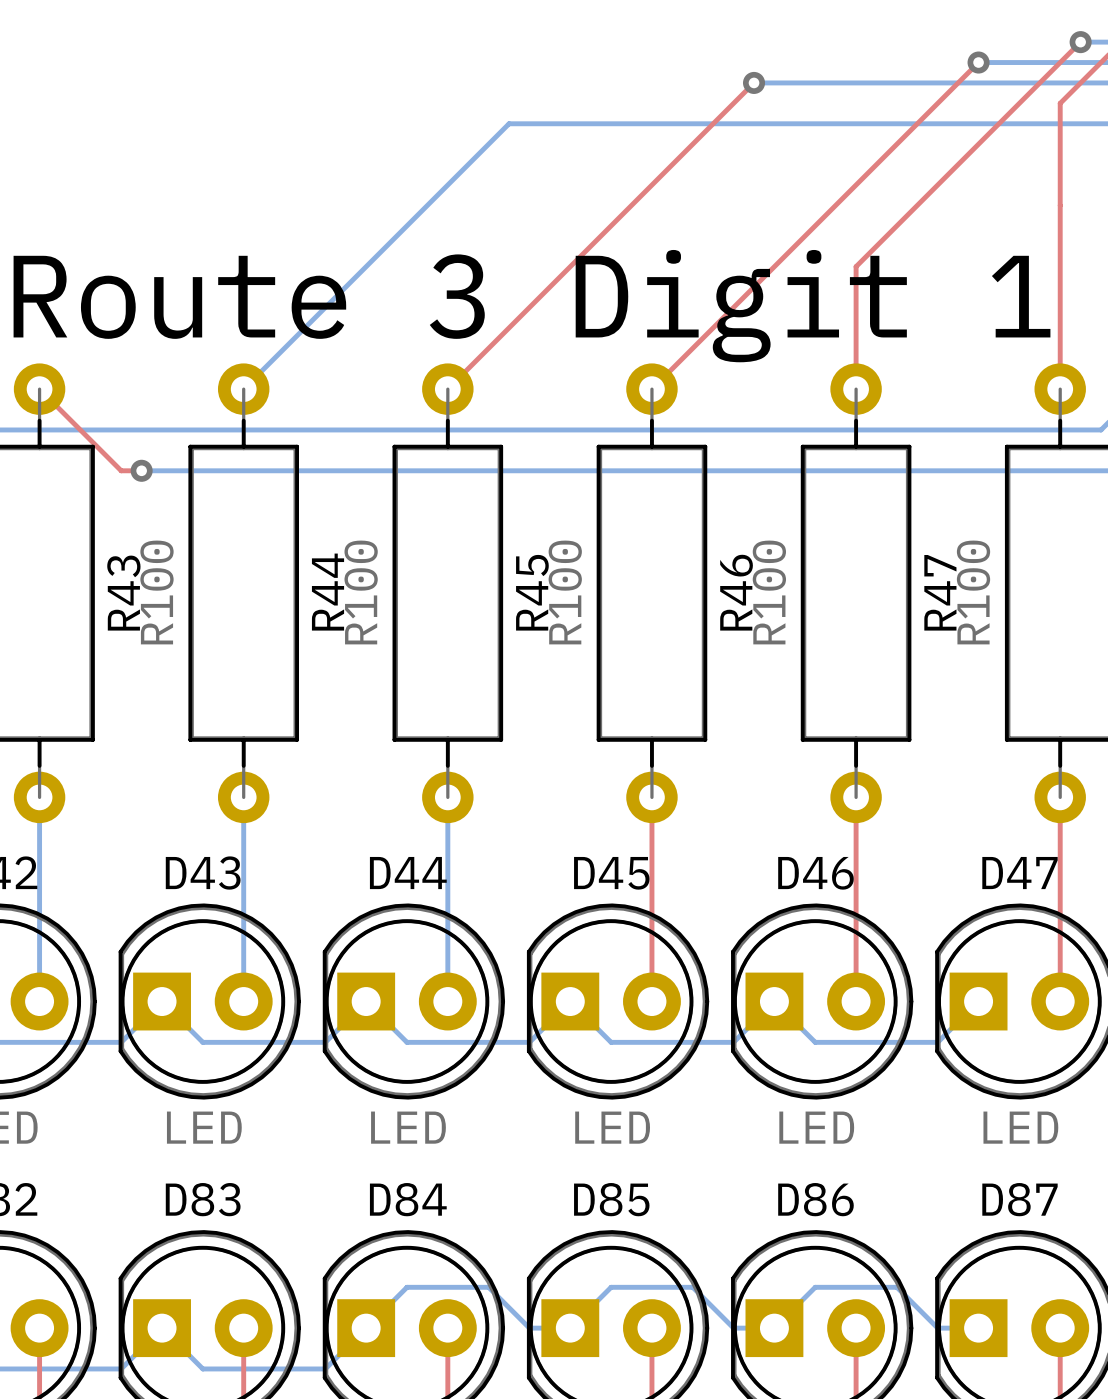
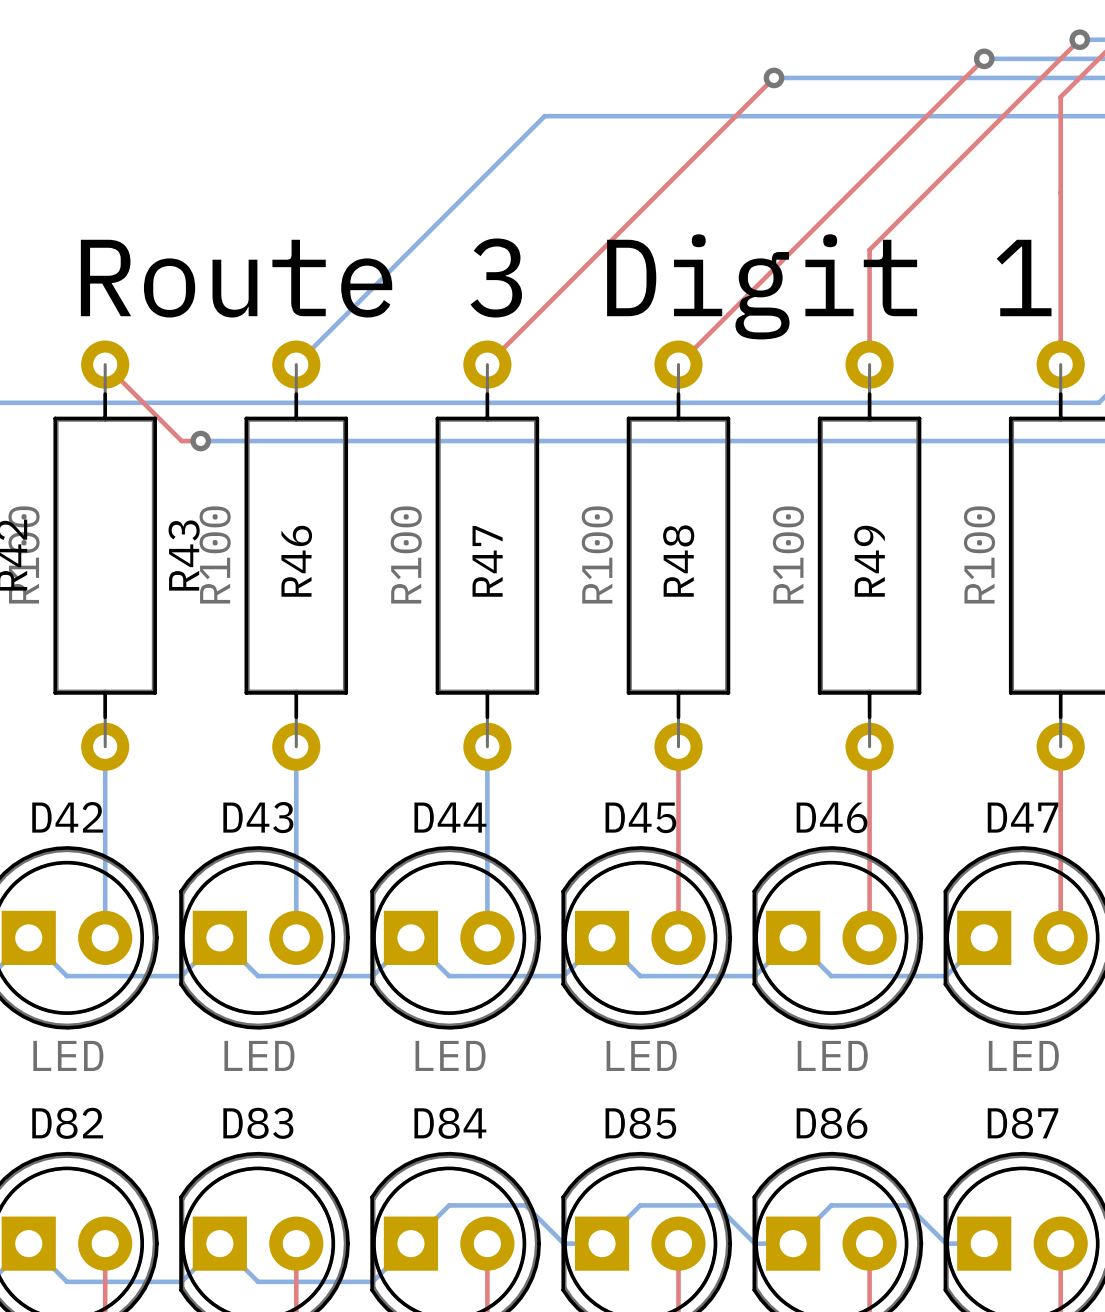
R44 name: R44 (328, 592) -> R46 (296, 561)
R45 name: R45 (532, 592) -> R47 (487, 561)
R46 name: R46 (736, 592) -> R48 (678, 561)
R47 name: R47 (940, 592) -> R49 (869, 561)

